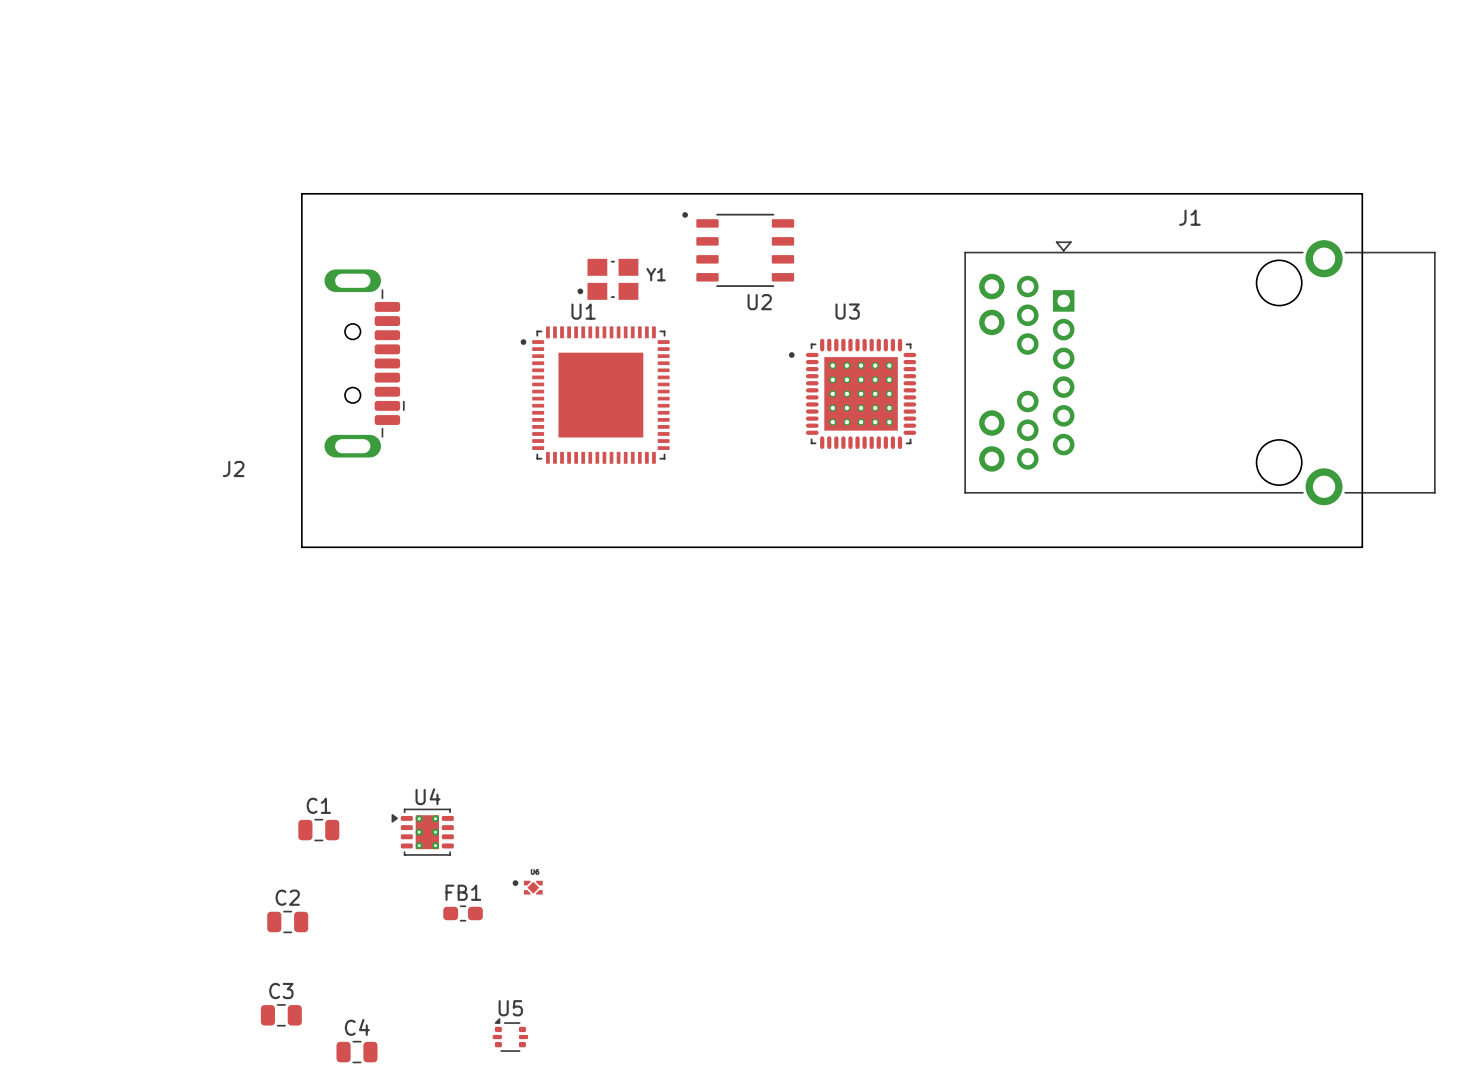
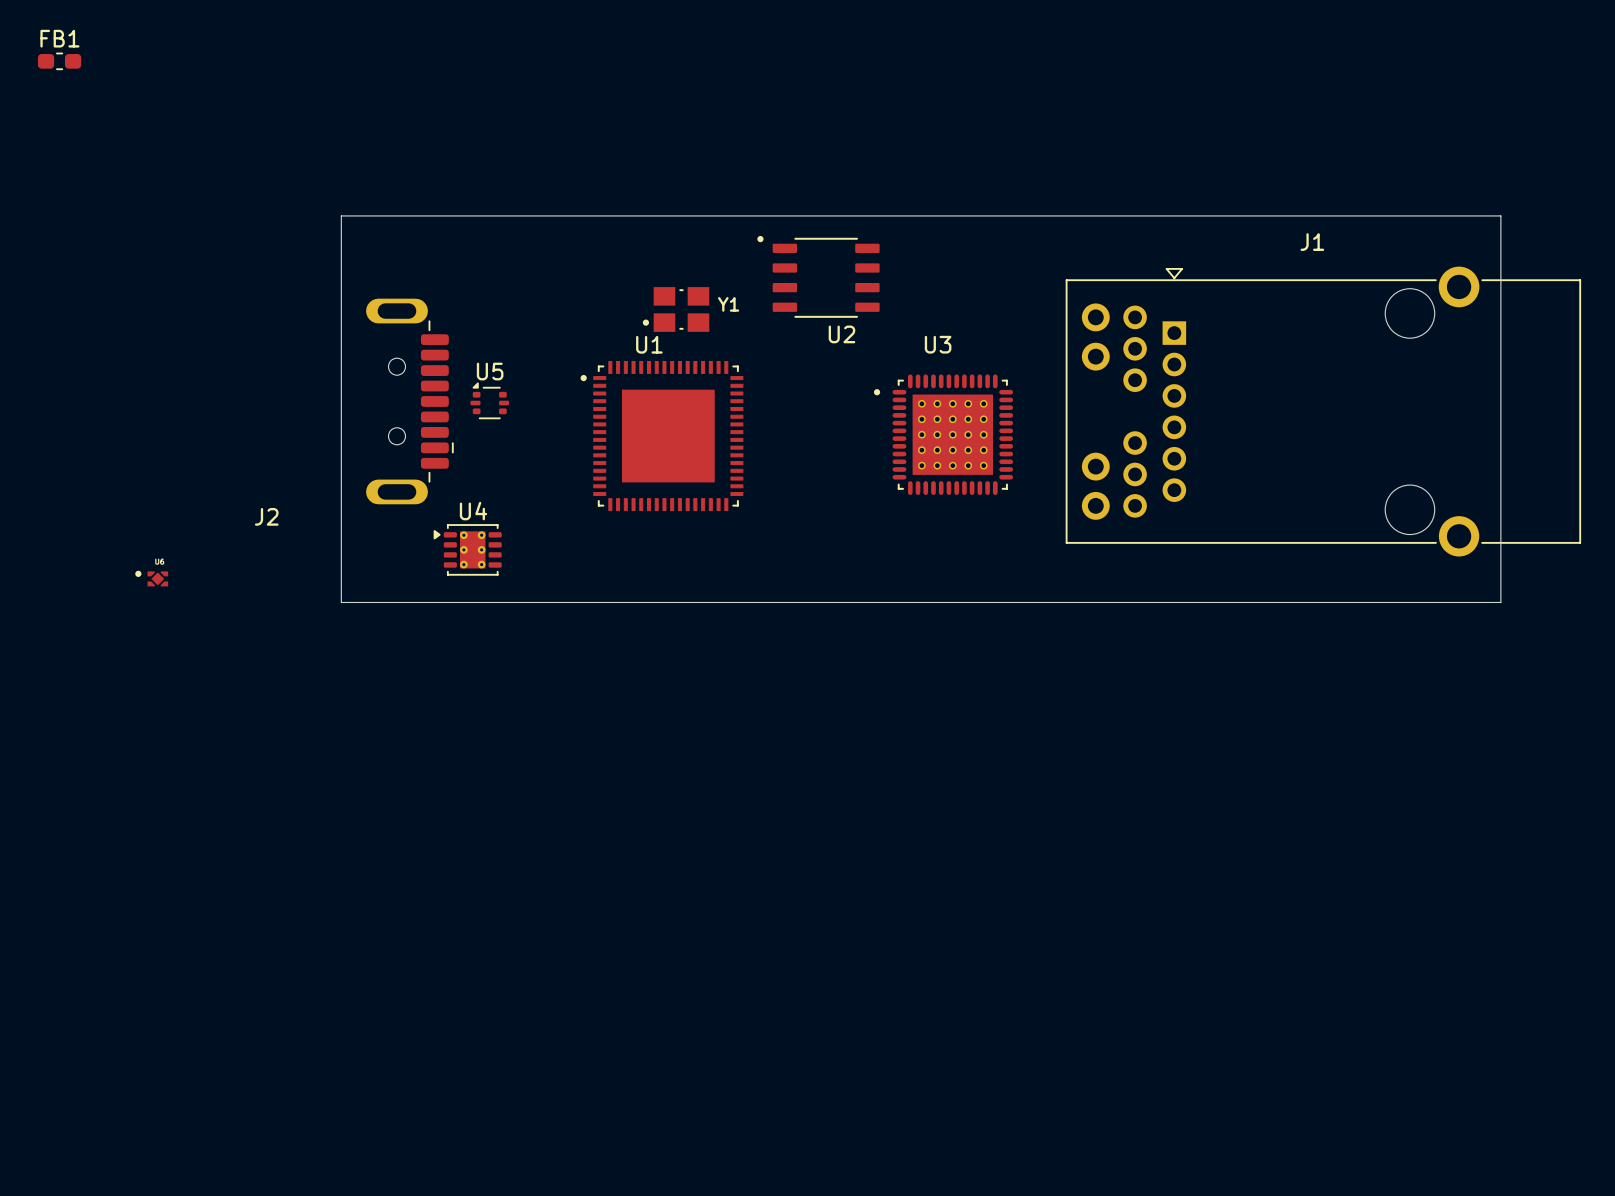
C1: (318, 830) -> none
U4 position: (422, 832) -> (467, 549)
part position: (527, 887) -> (151, 578)
FB1 position: (463, 913) -> (59, 61)
C2: (287, 921) -> none
C3: (281, 1015) -> none
U5 position: (510, 1035) -> (489, 400)
C4: (357, 1052) -> none

